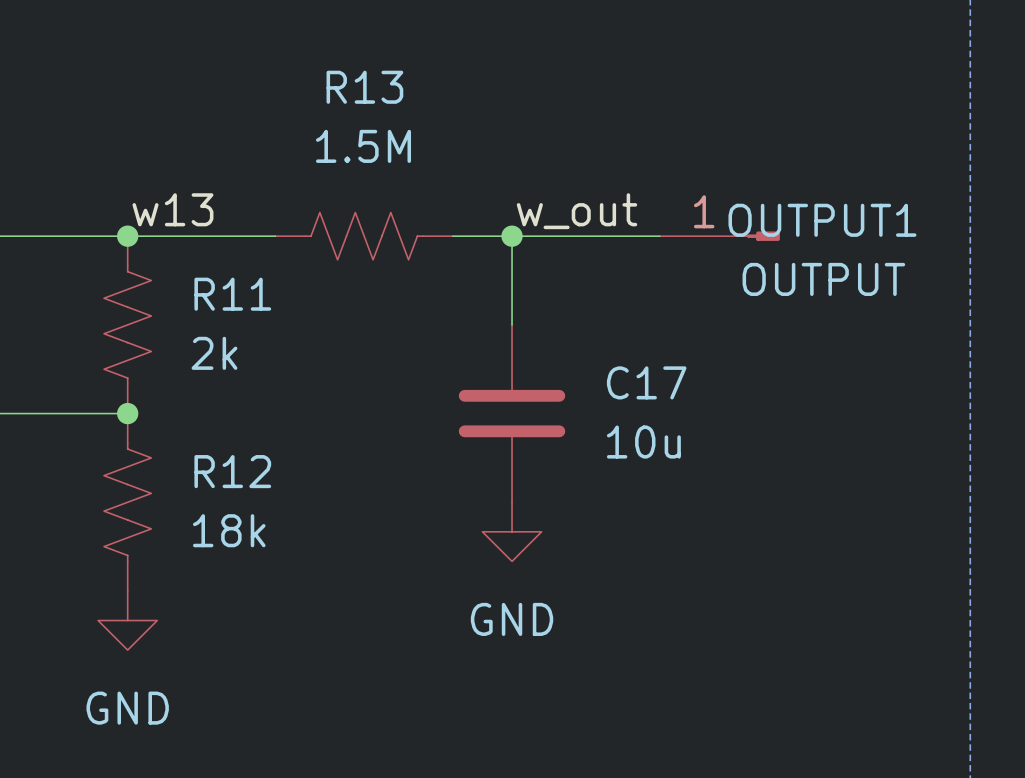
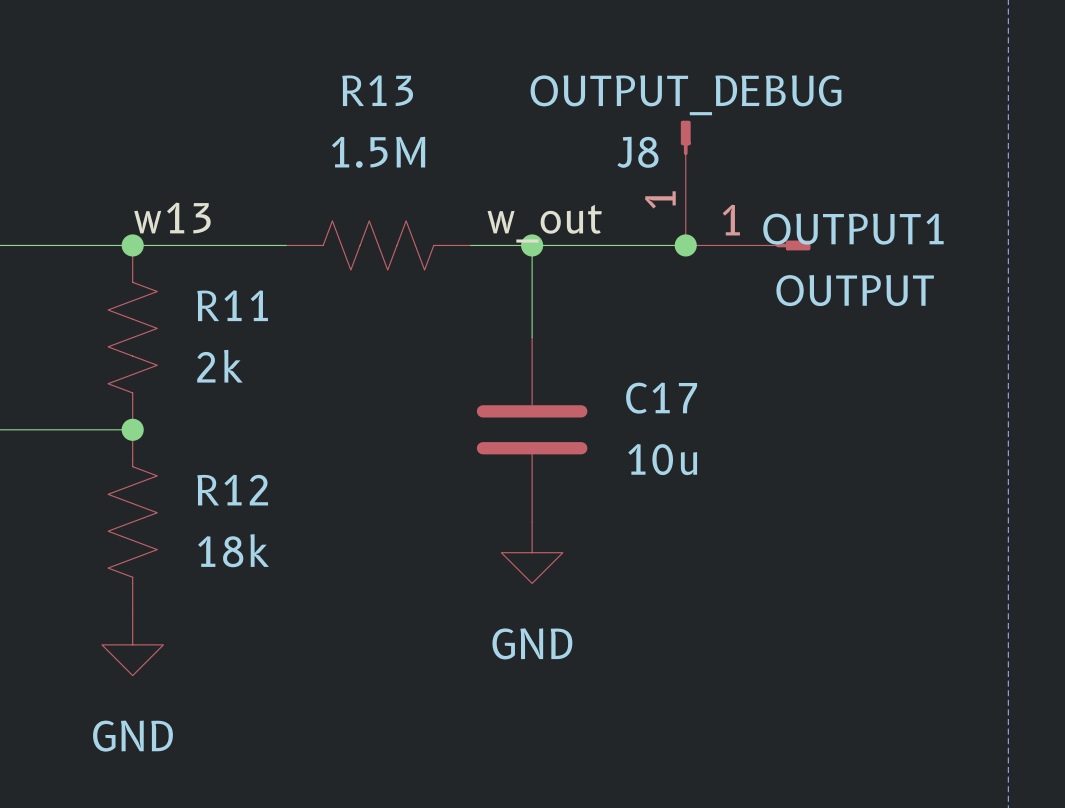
J8: none -> OUTPUT_DEBUG (685, 183)
label position: w_out (577, 211) -> w_out (544, 223)
junction: none -> (685, 245)

